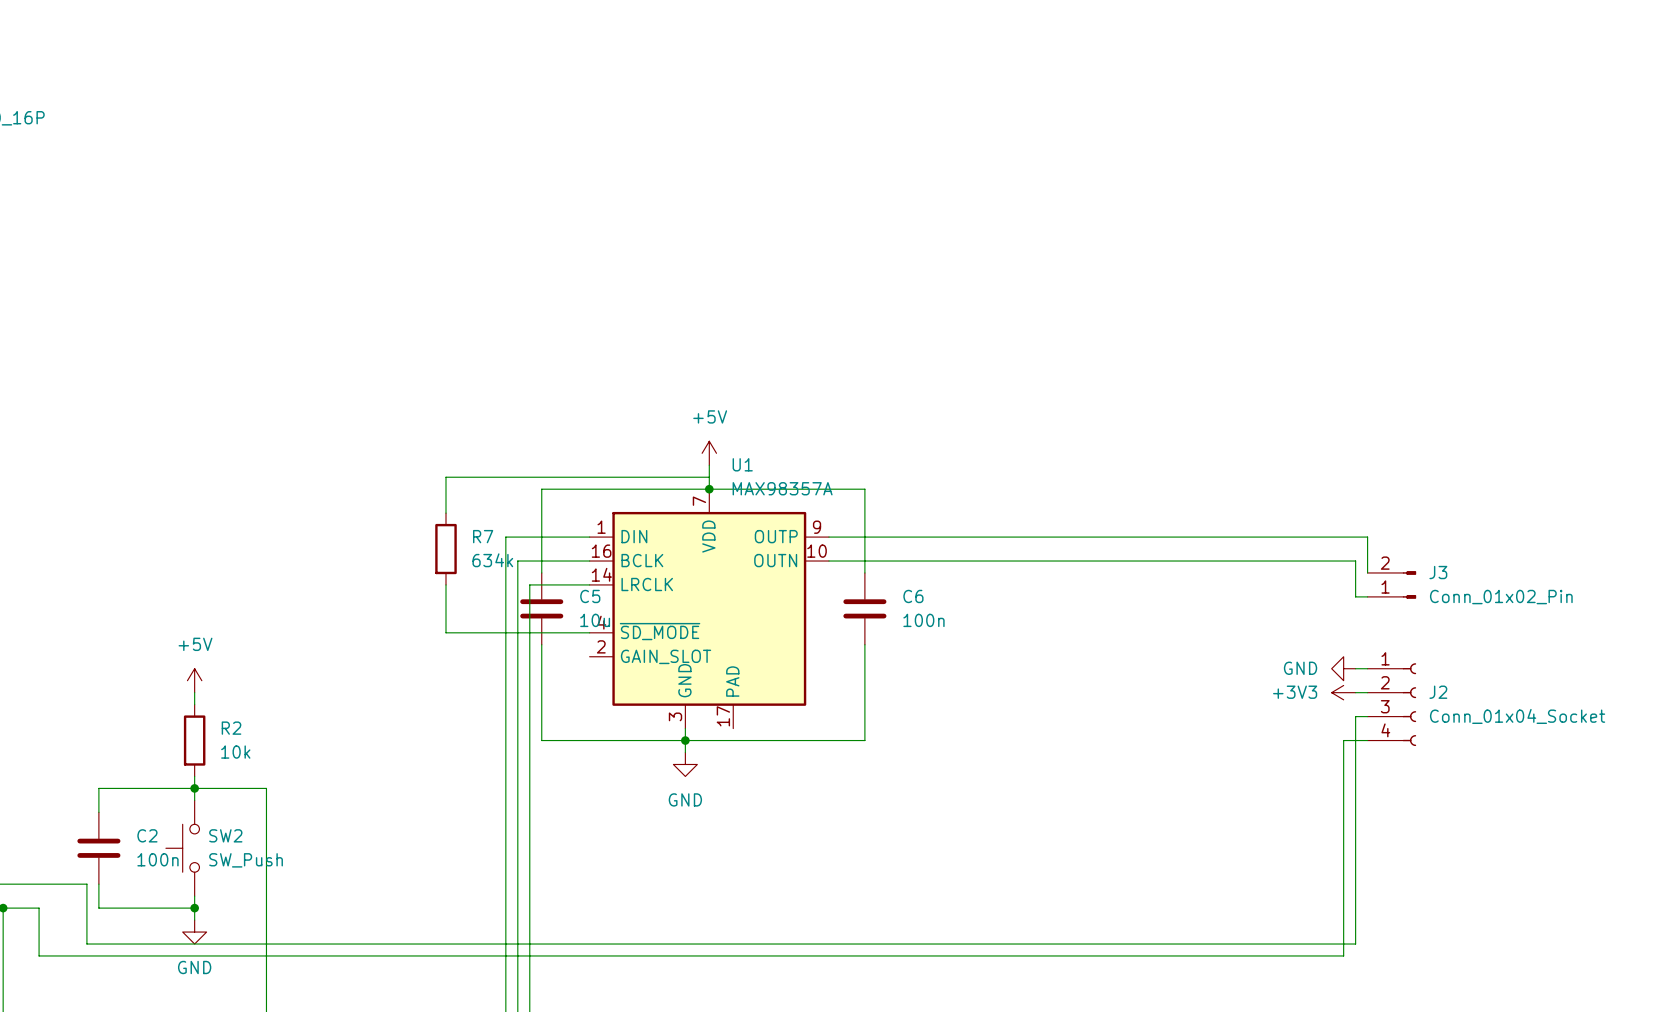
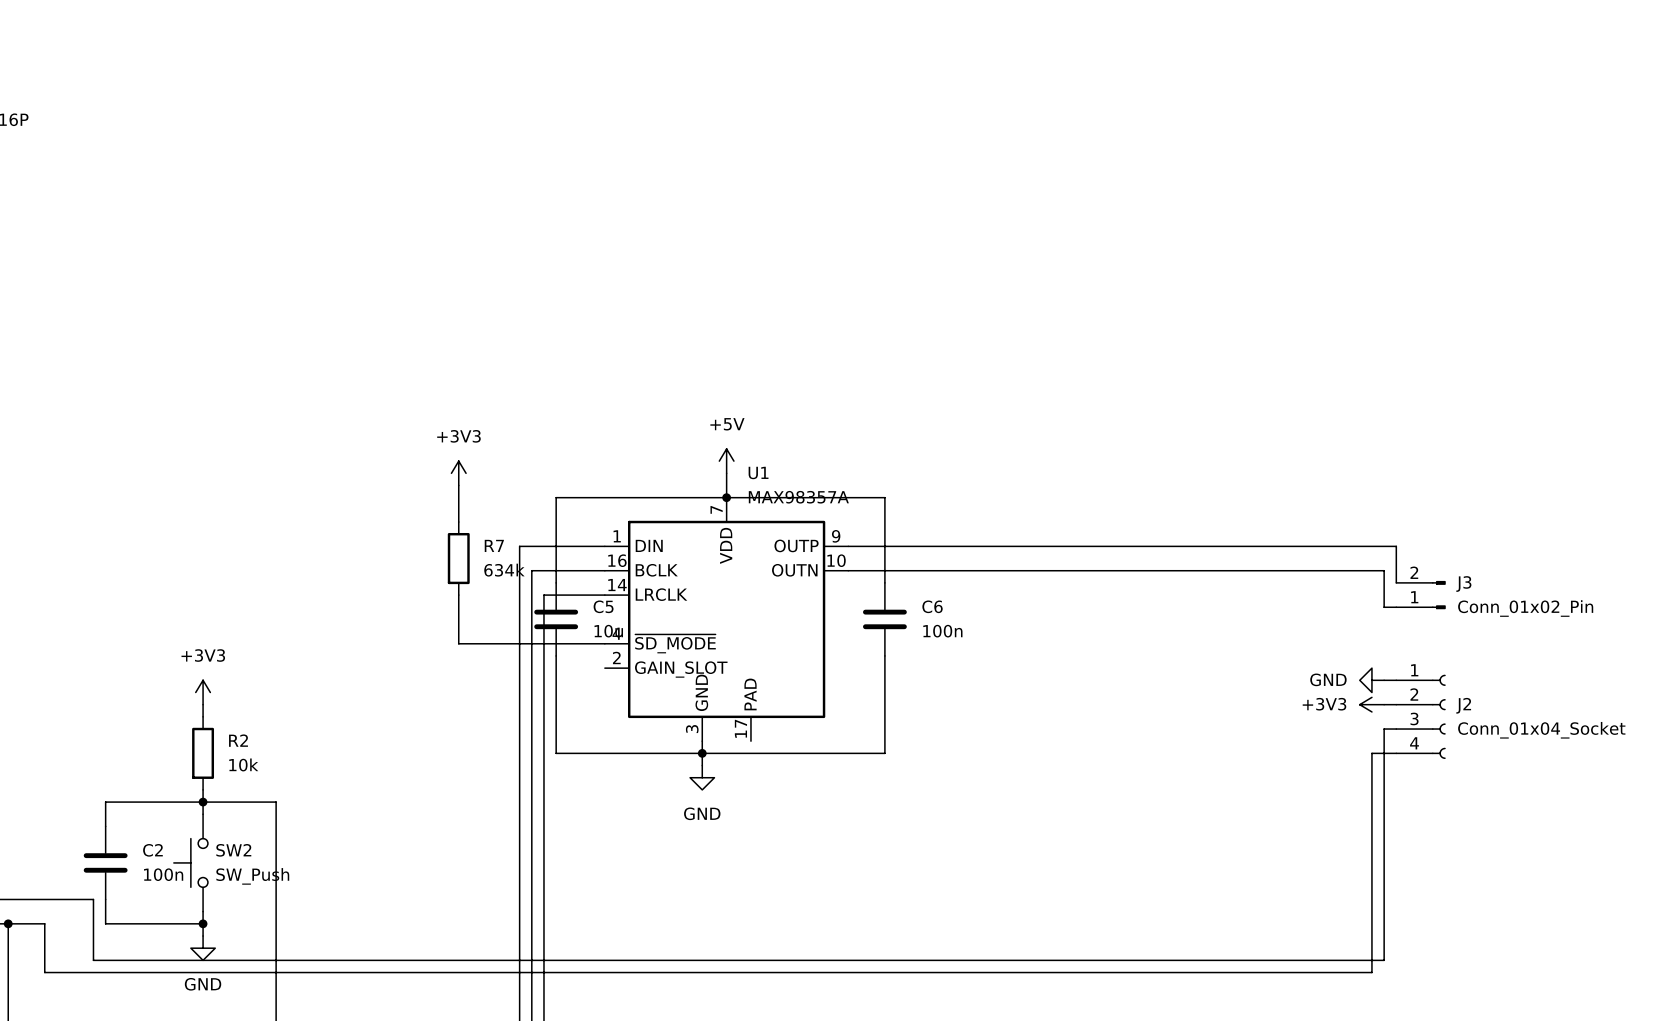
power symbol: none -> +3V3 (458, 473)
wire: (446, 477) (709, 477) -> none
power symbol: +5V (194, 680) -> +3V3 (203, 692)

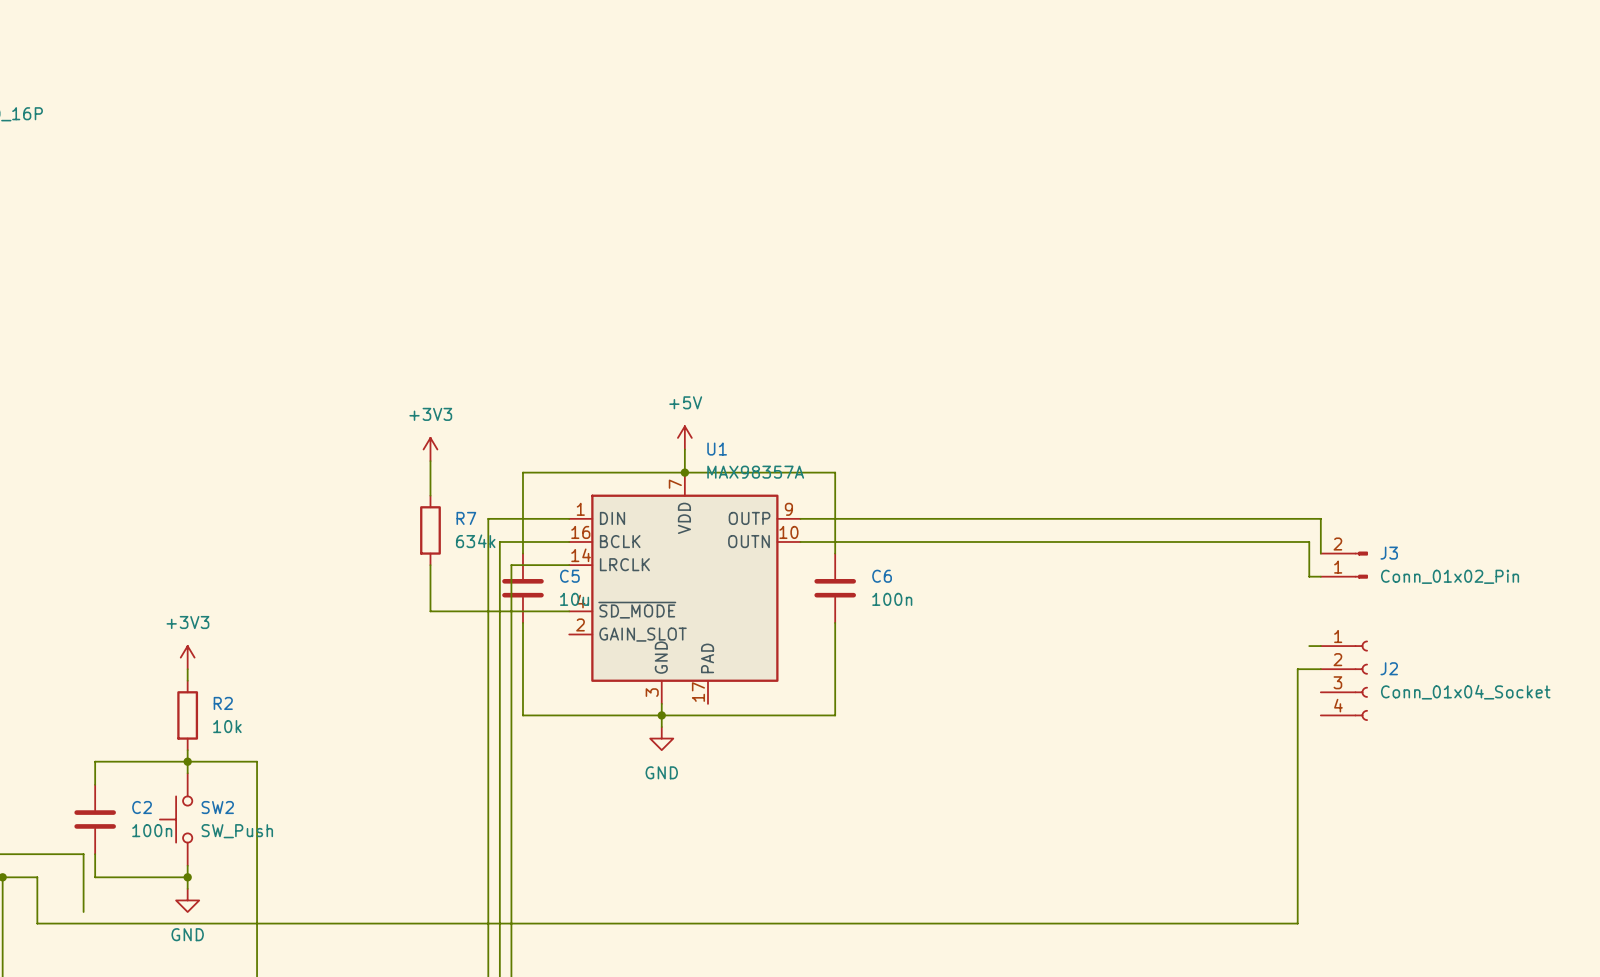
power symbol: GND (1371, 680) -> none
power symbol: +3V3 (1371, 704) -> none
wire: (1396, 729) (1384, 729) (1384, 960) (93, 960) -> none
wire: (1371, 753) (1396, 753) -> (1297, 715) (1297, 669) (1309, 669)

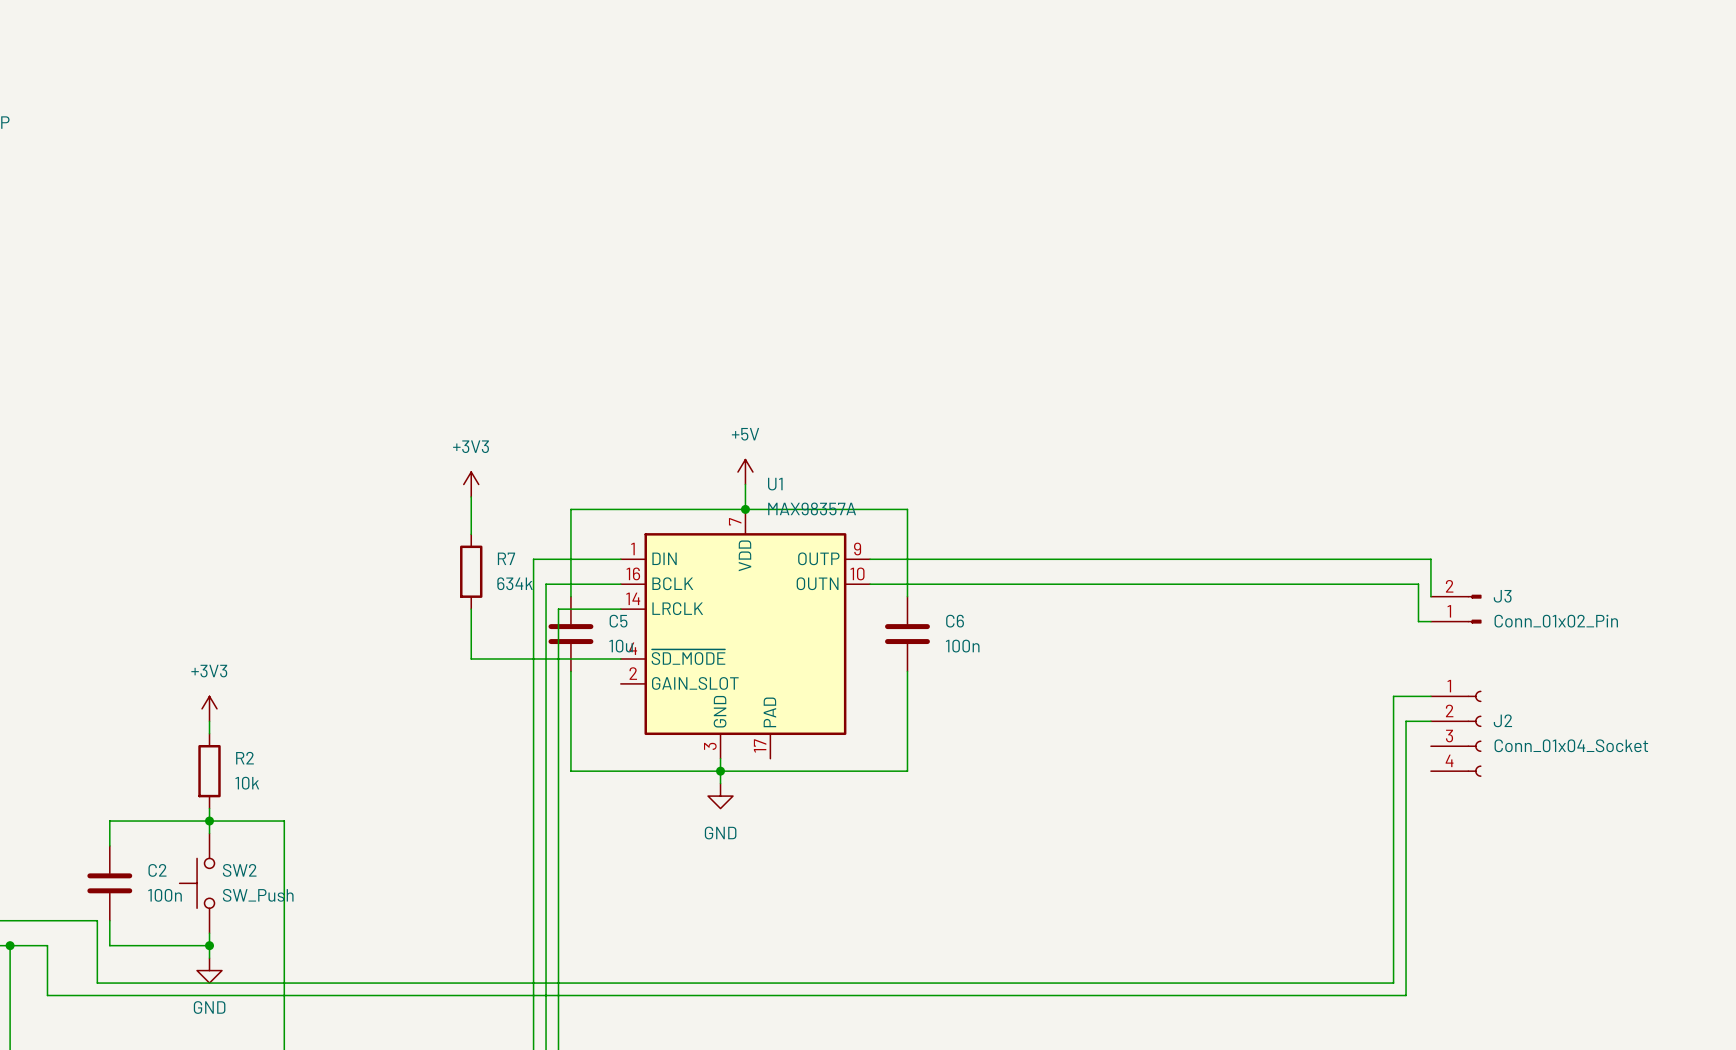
wire: none -> (1418, 696) (1393, 696) (1393, 983) (97, 983)

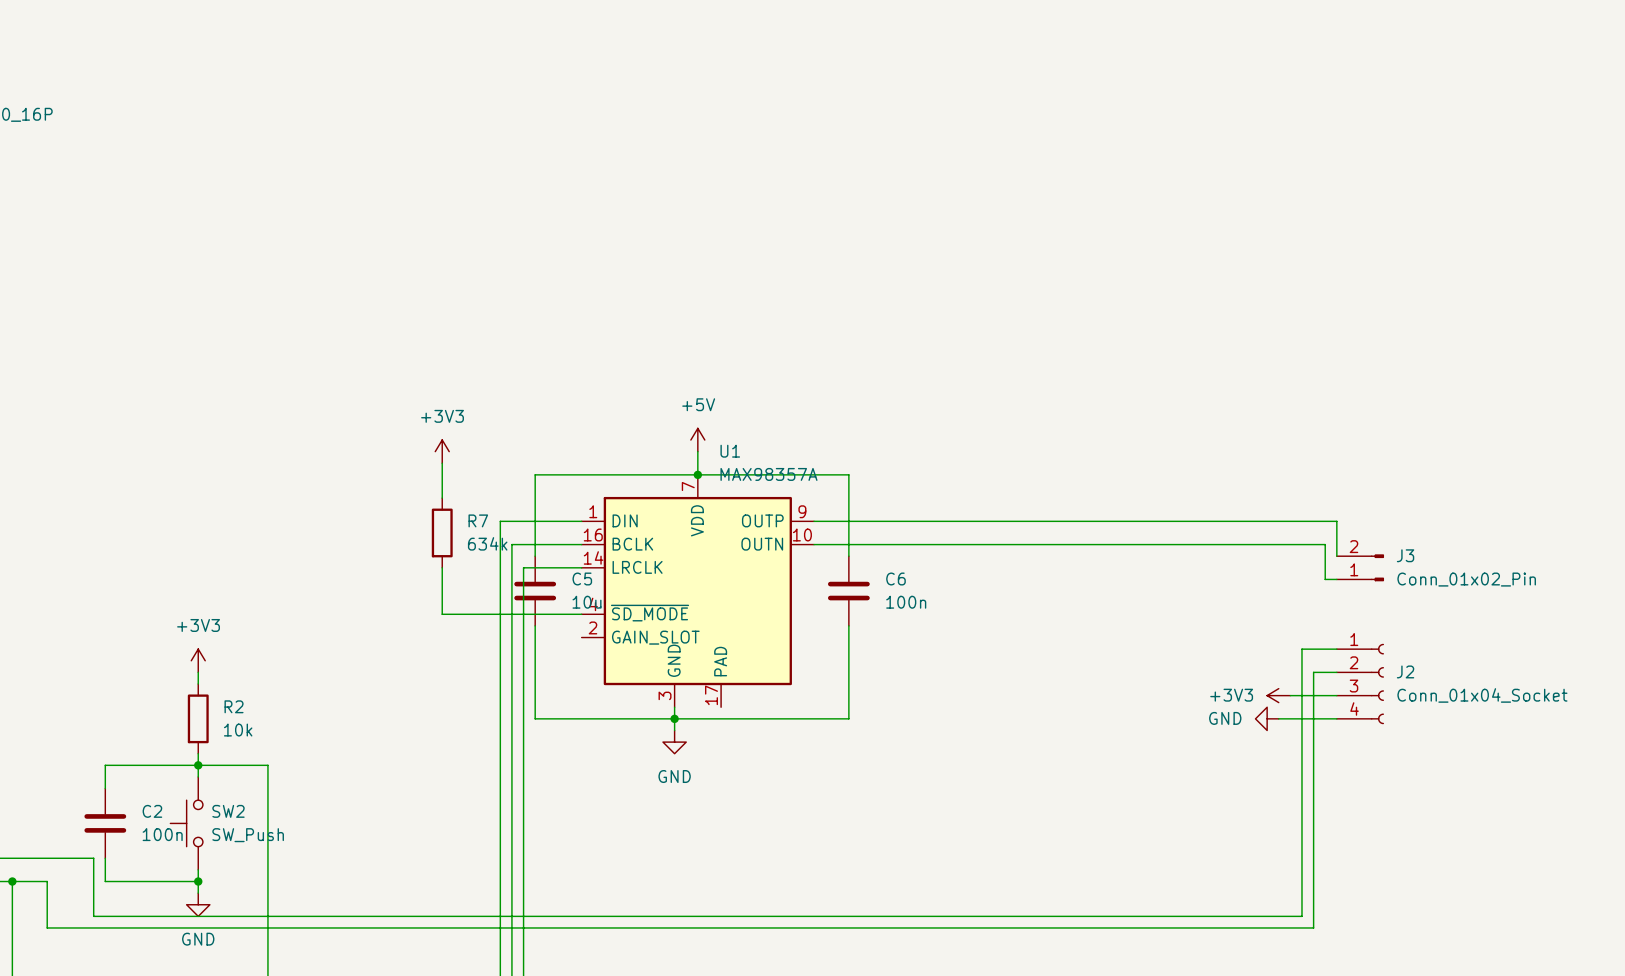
power symbol: none -> +3V3 (1278, 695)
wire: none -> (1290, 695) (1336, 695)
power symbol: none -> GND (1267, 718)
wire: none -> (1278, 718) (1336, 718)

